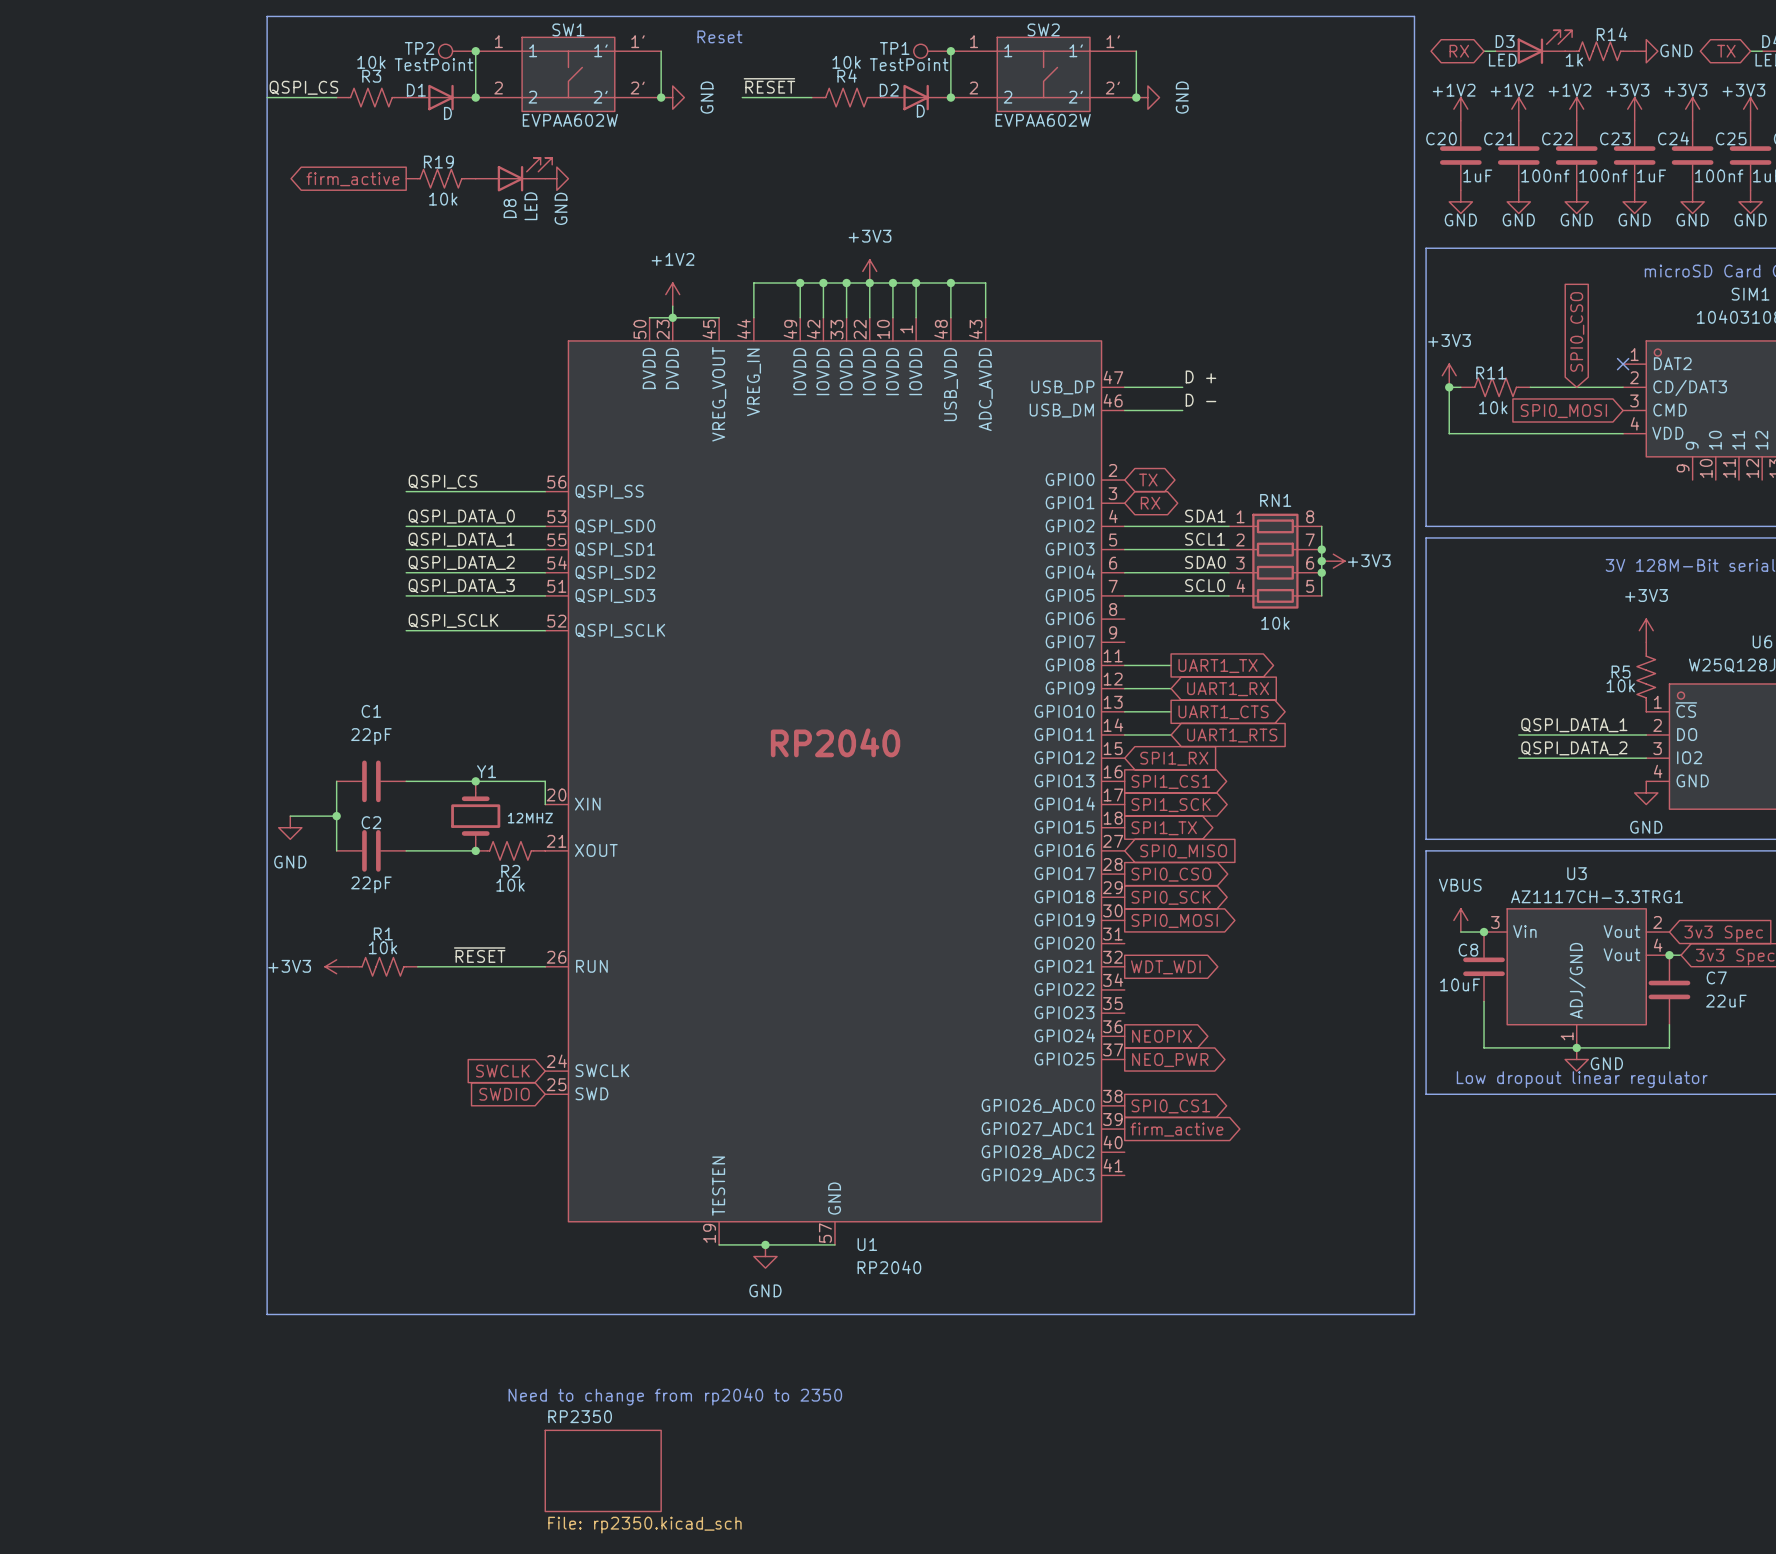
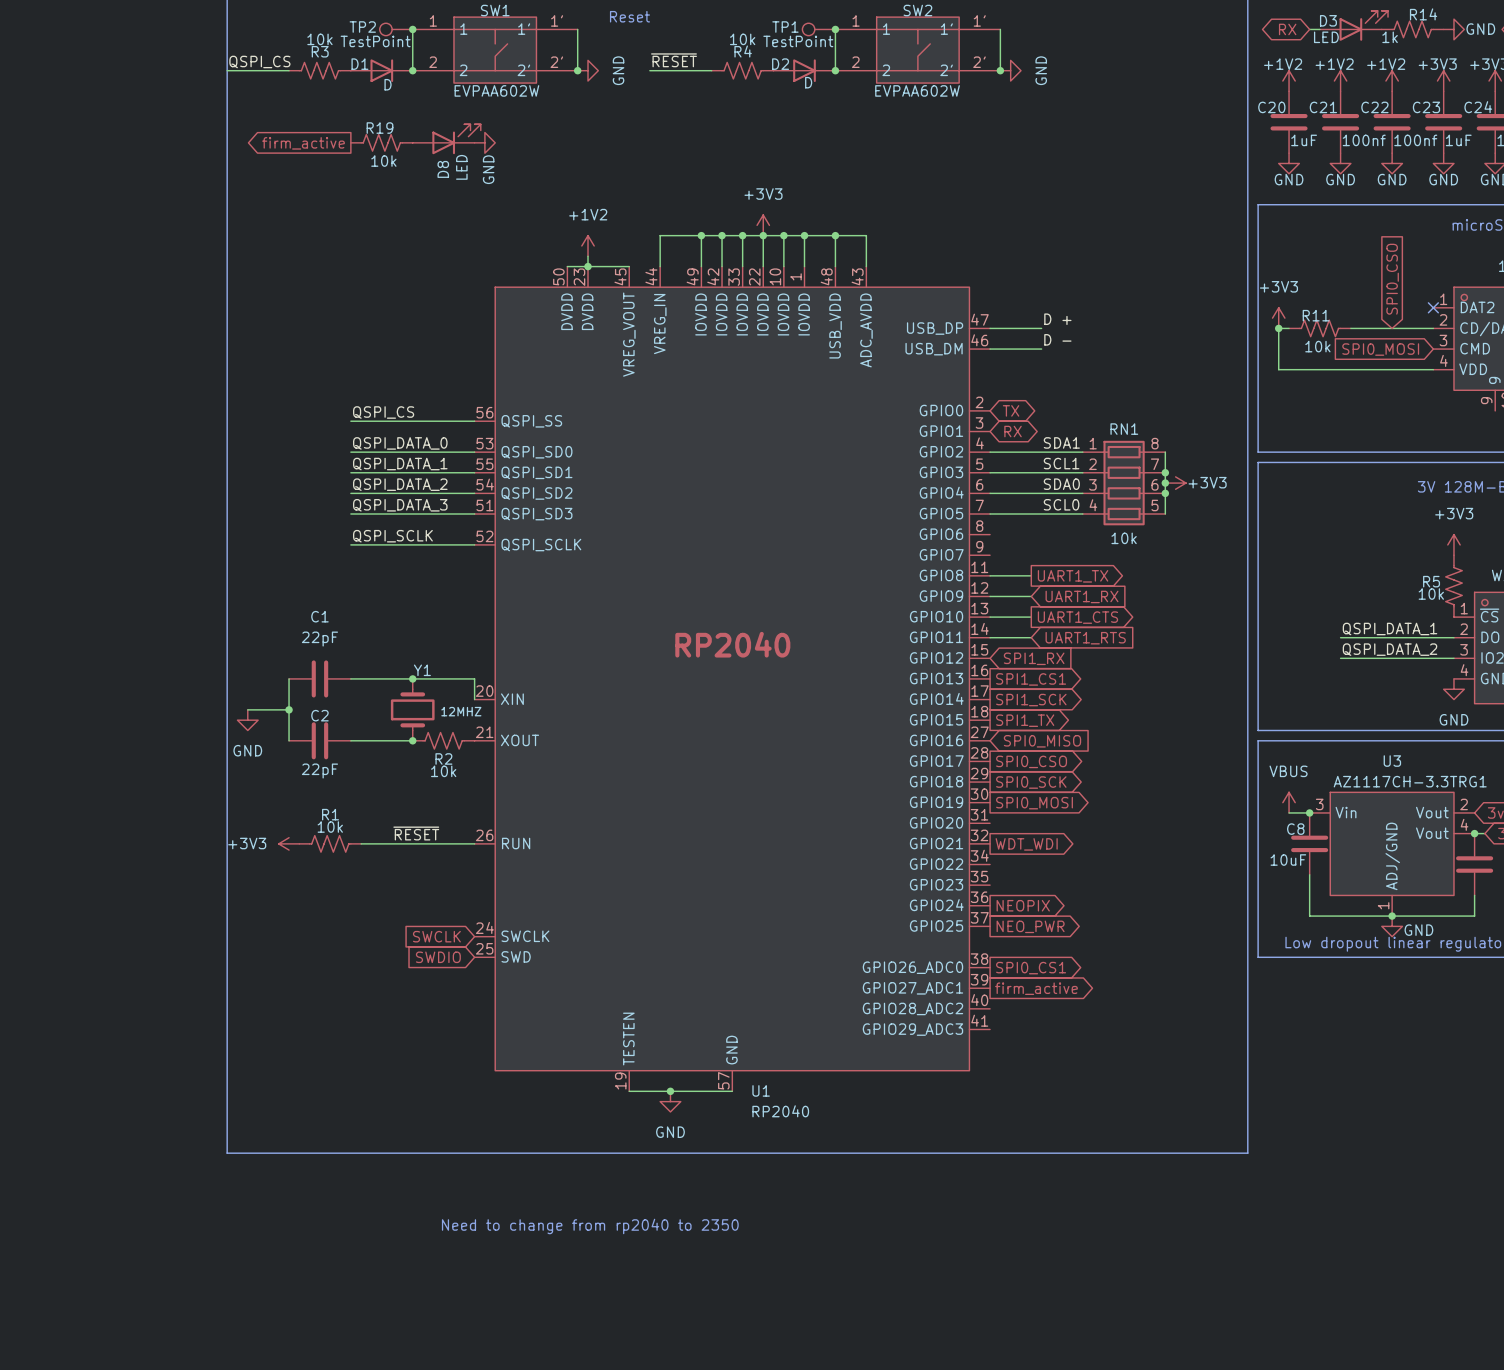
sheet RP2350: File: rp2350.kicad_sch (603, 1470) -> none

